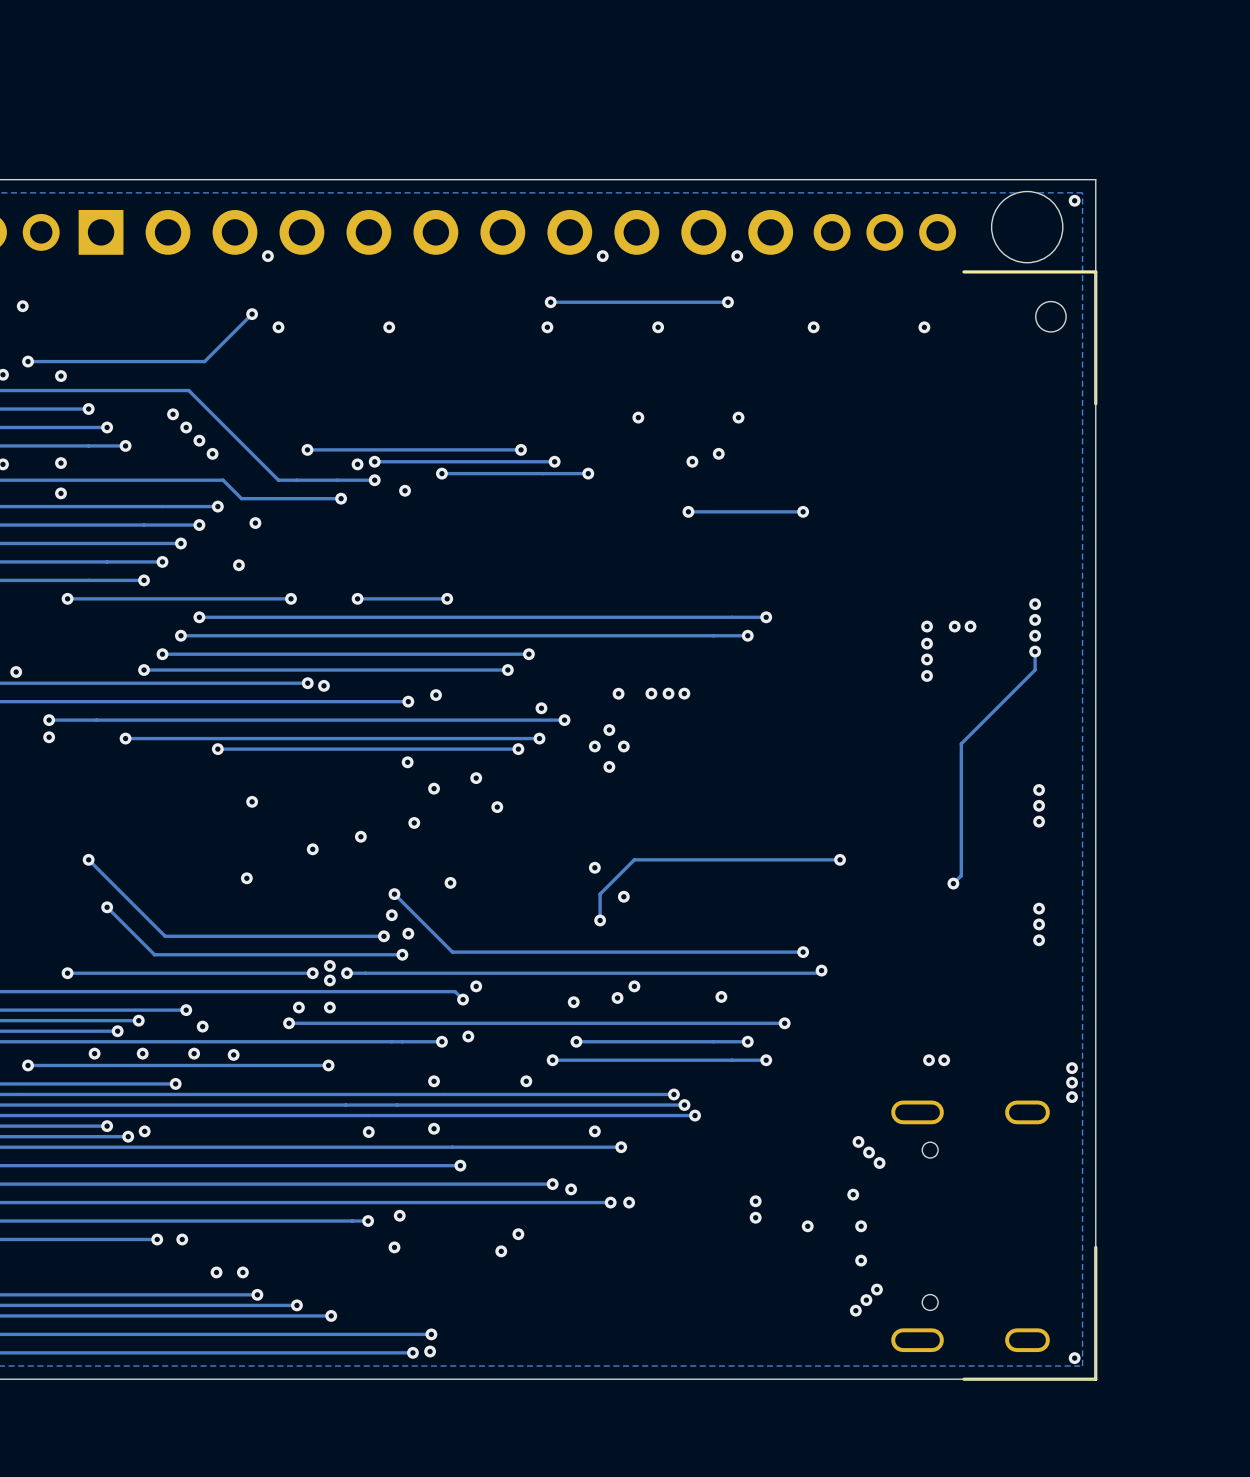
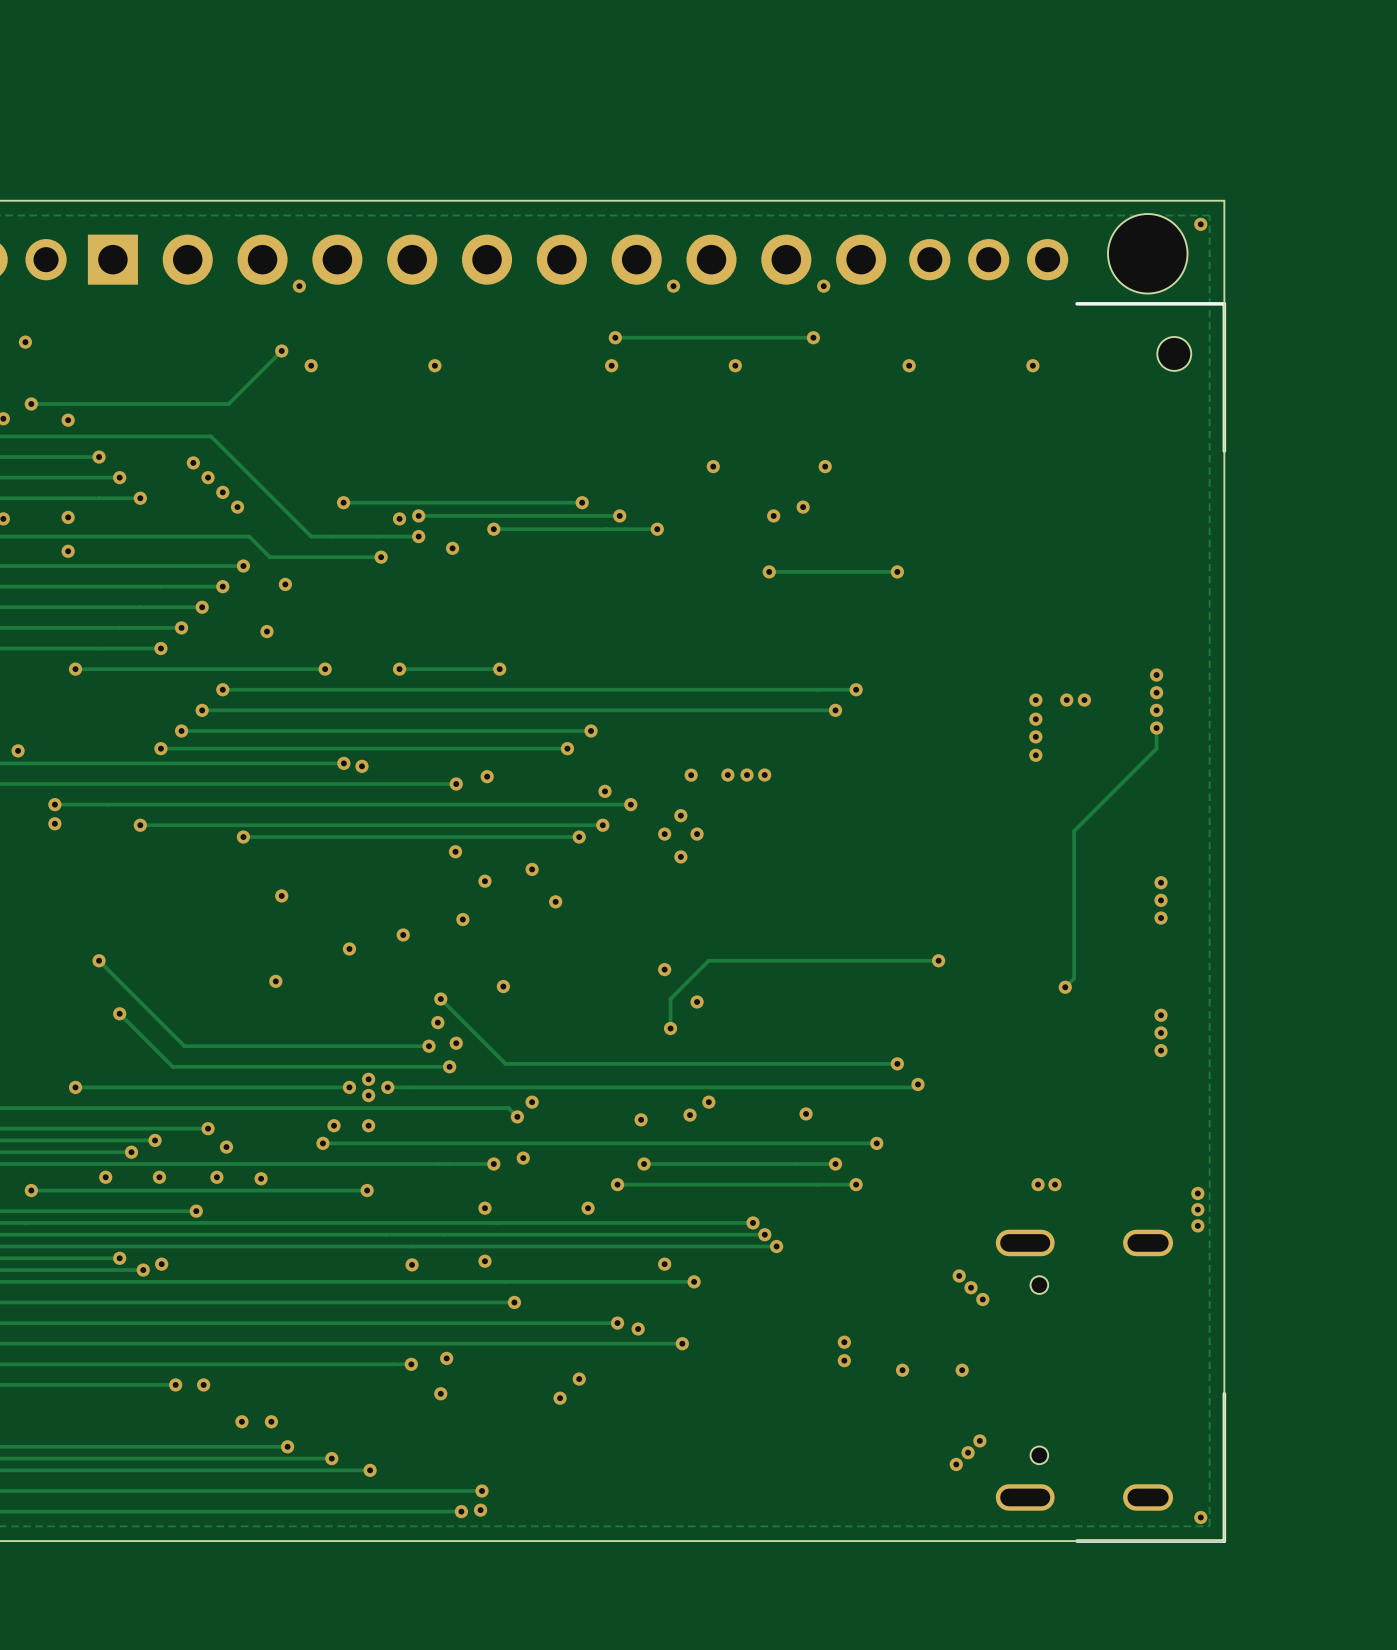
via: (853, 1194) -> none
via: (629, 1202) -> none
via: (861, 1260) -> none

